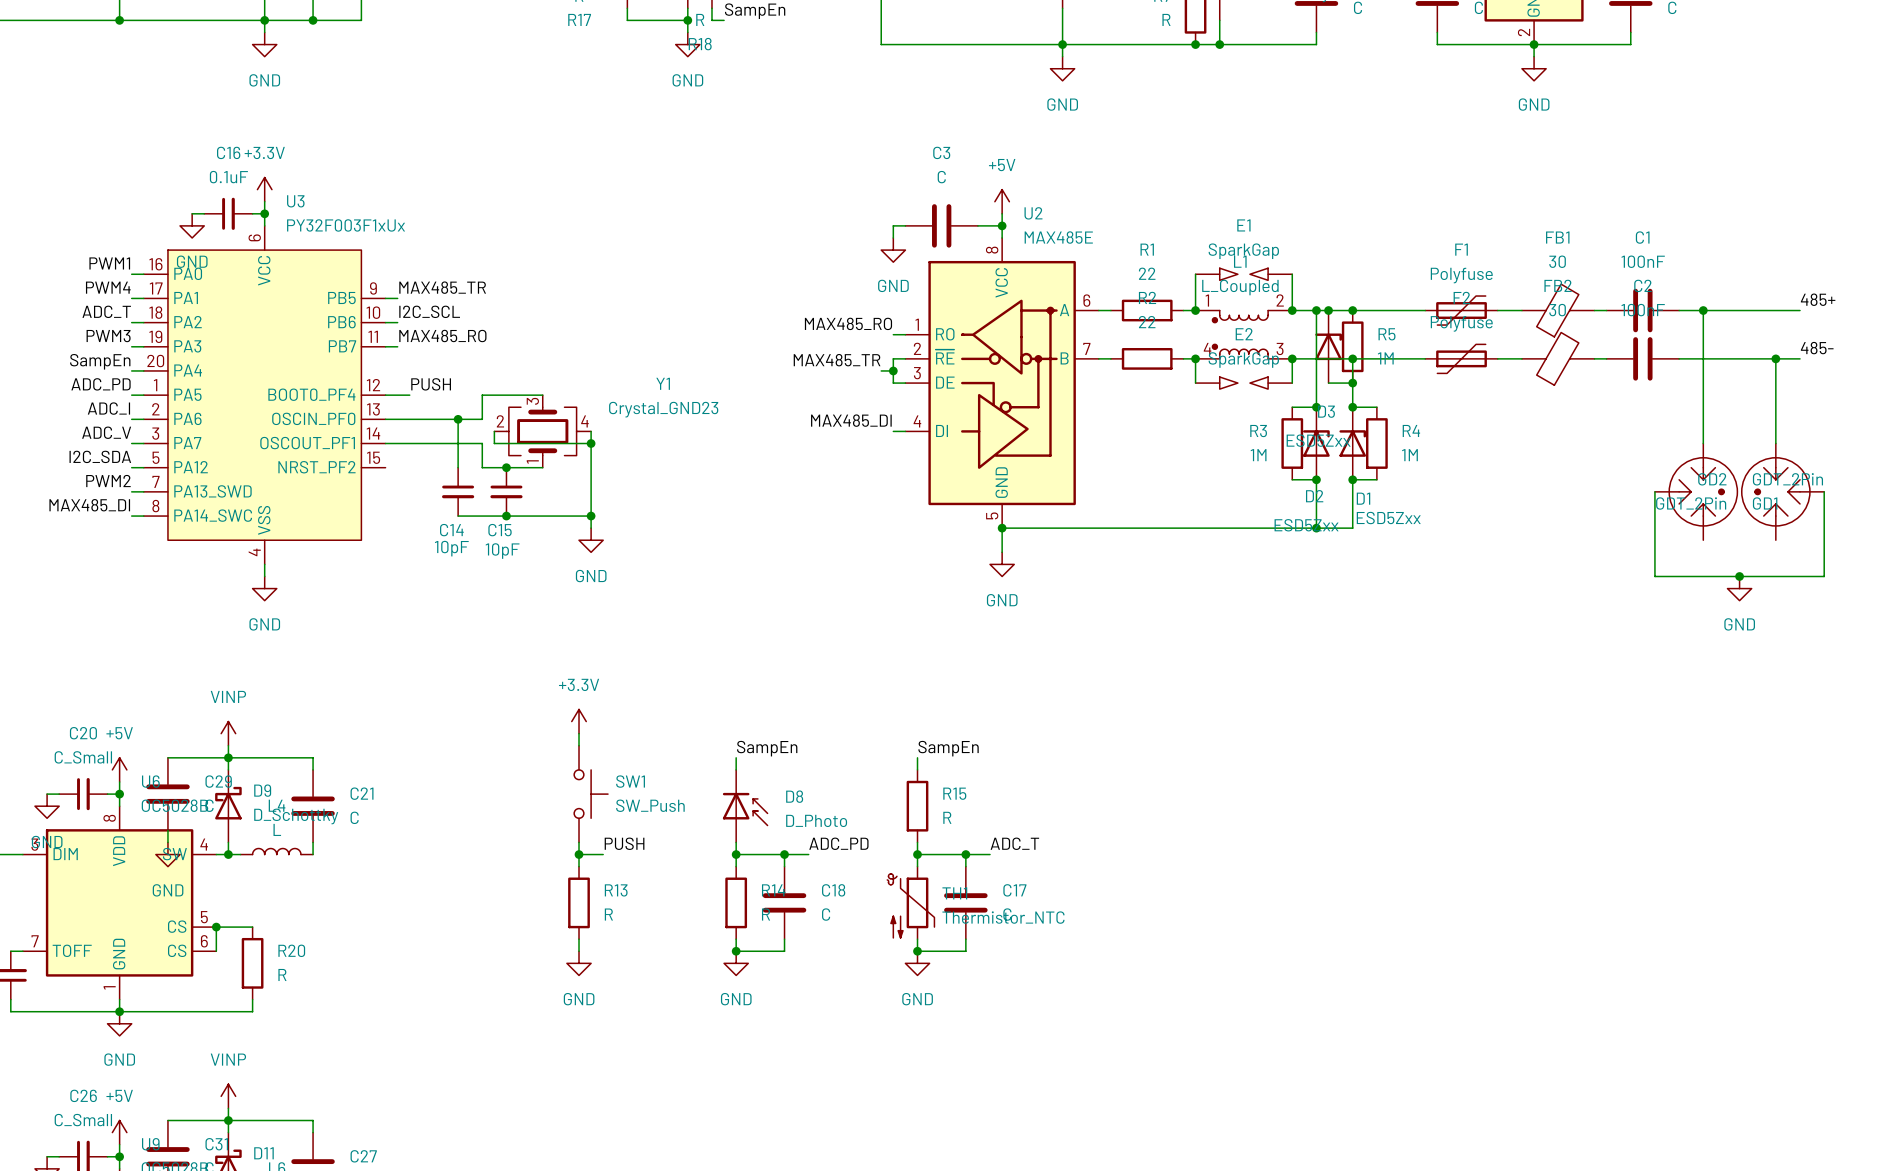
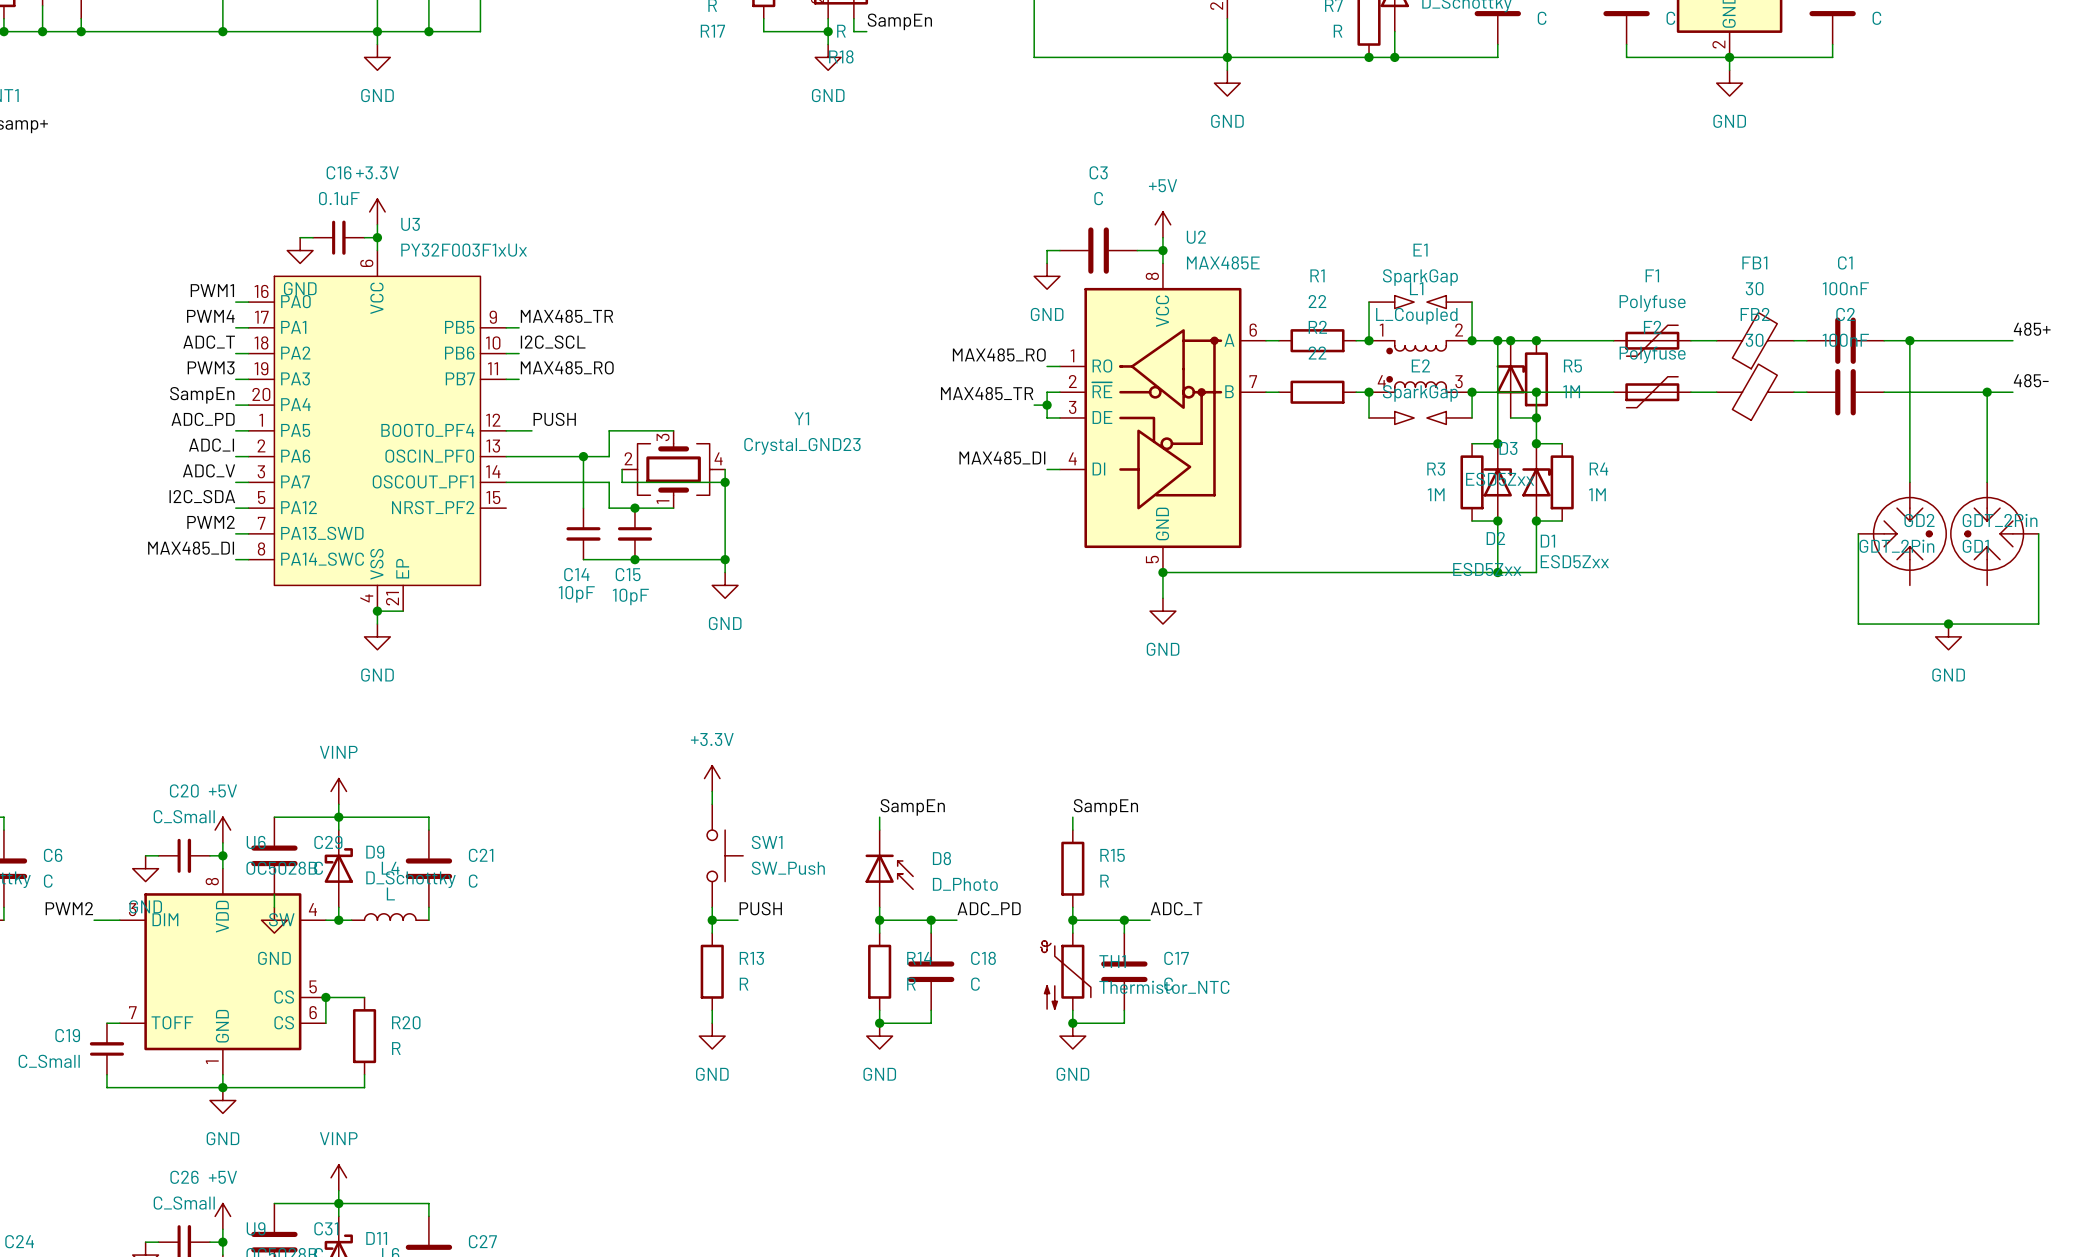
U3 symbol: [143, 225, 386, 565] -> [248, 250, 507, 612]
wire: none -> (377, 611) (403, 611)
junction: none -> (377, 611)

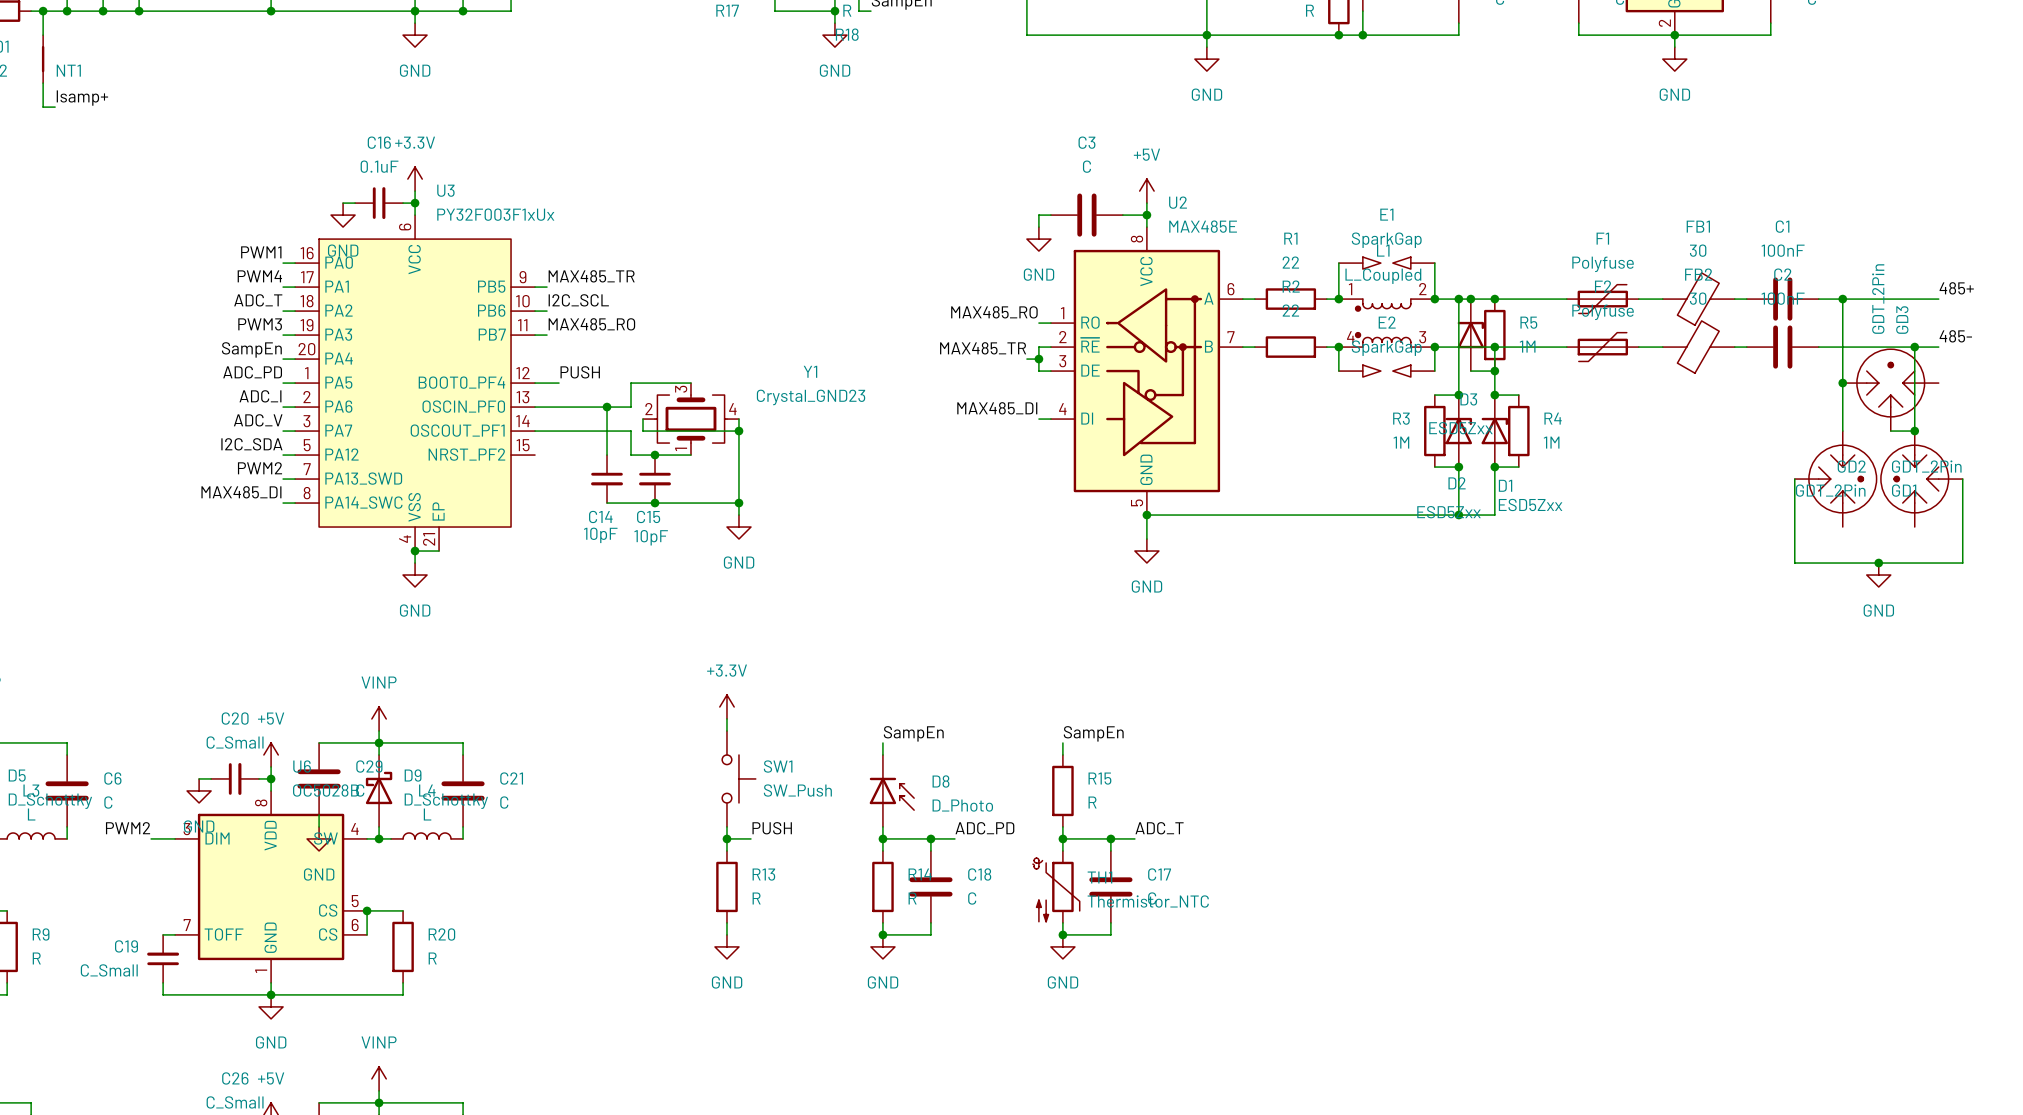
junction: none -> (1842, 383)
GD3: none -> GDT_2Pin (1890, 390)
wire: none -> (1890, 431) (1914, 431)
junction: none -> (1914, 431)

